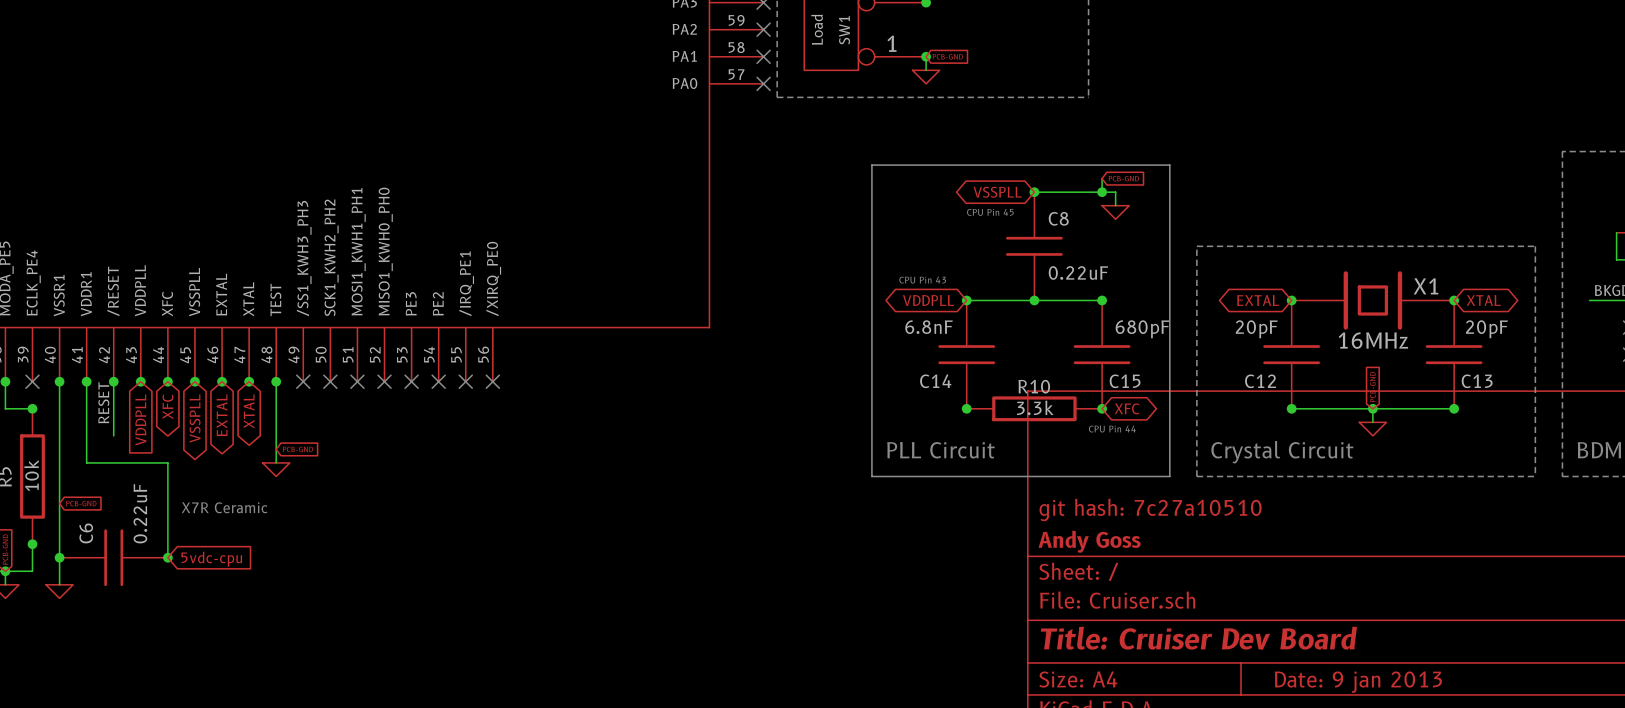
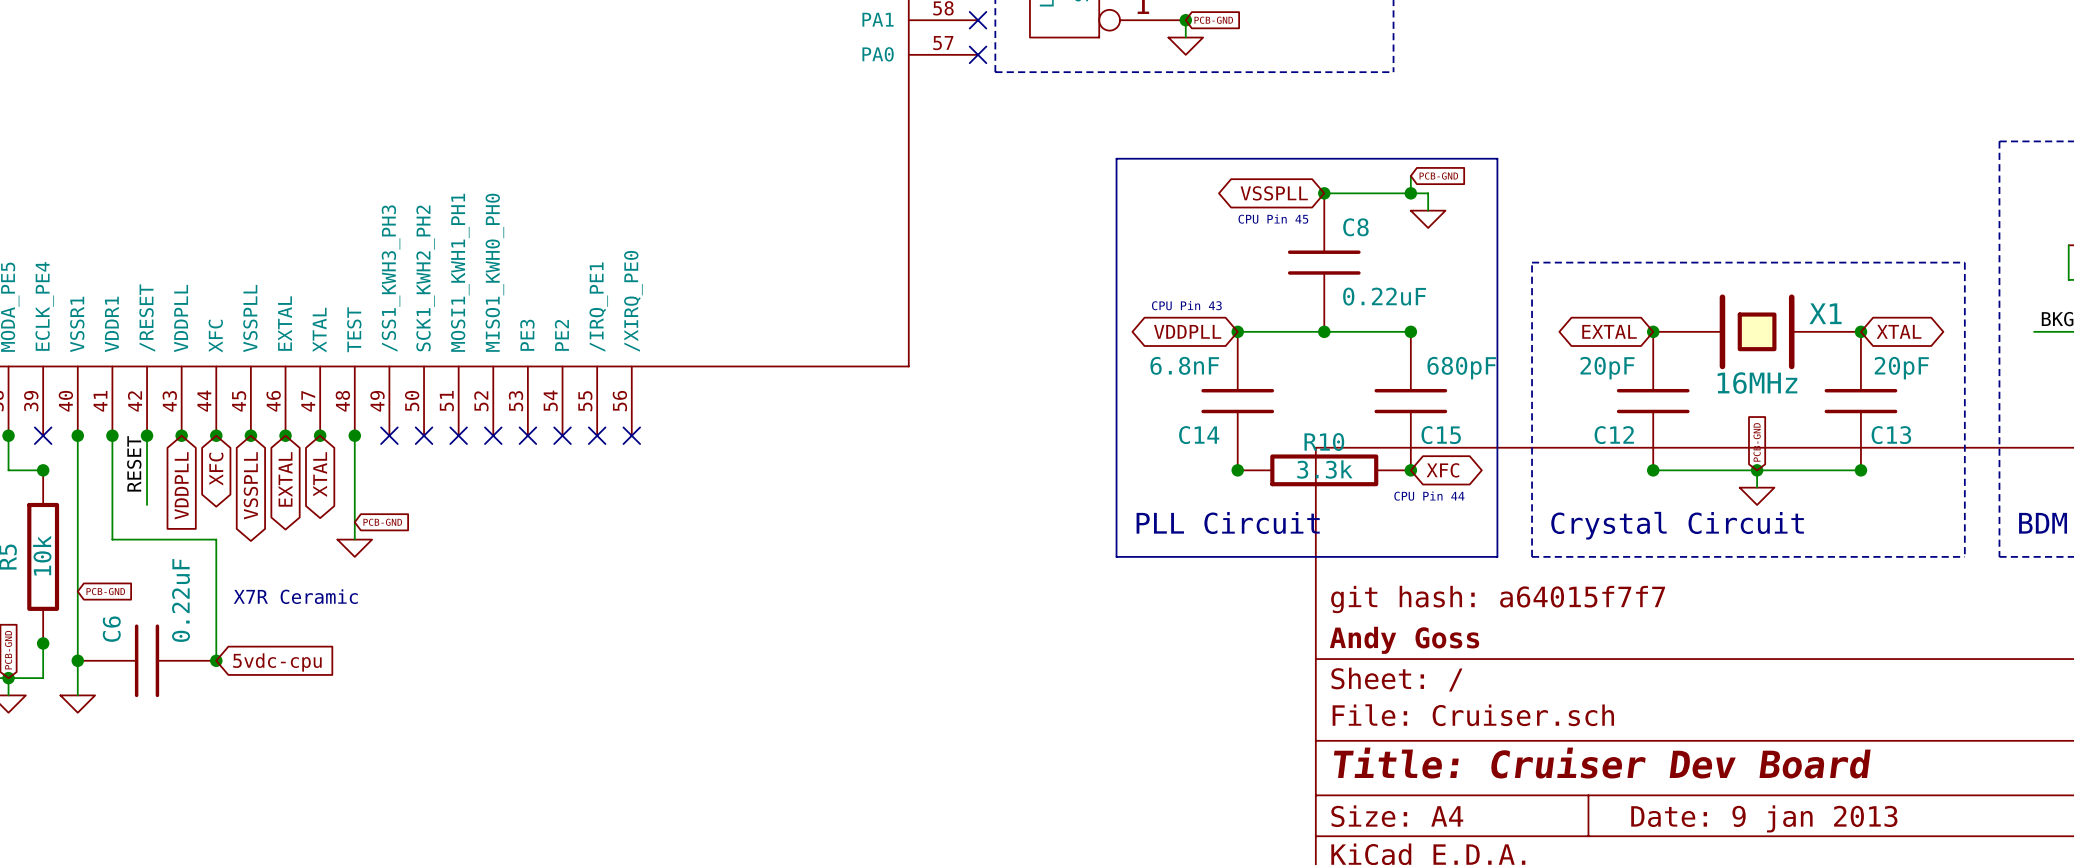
title block: git hash: 7c27a10510 (1150, 509) -> git hash: a64015f7f7 (1498, 599)

